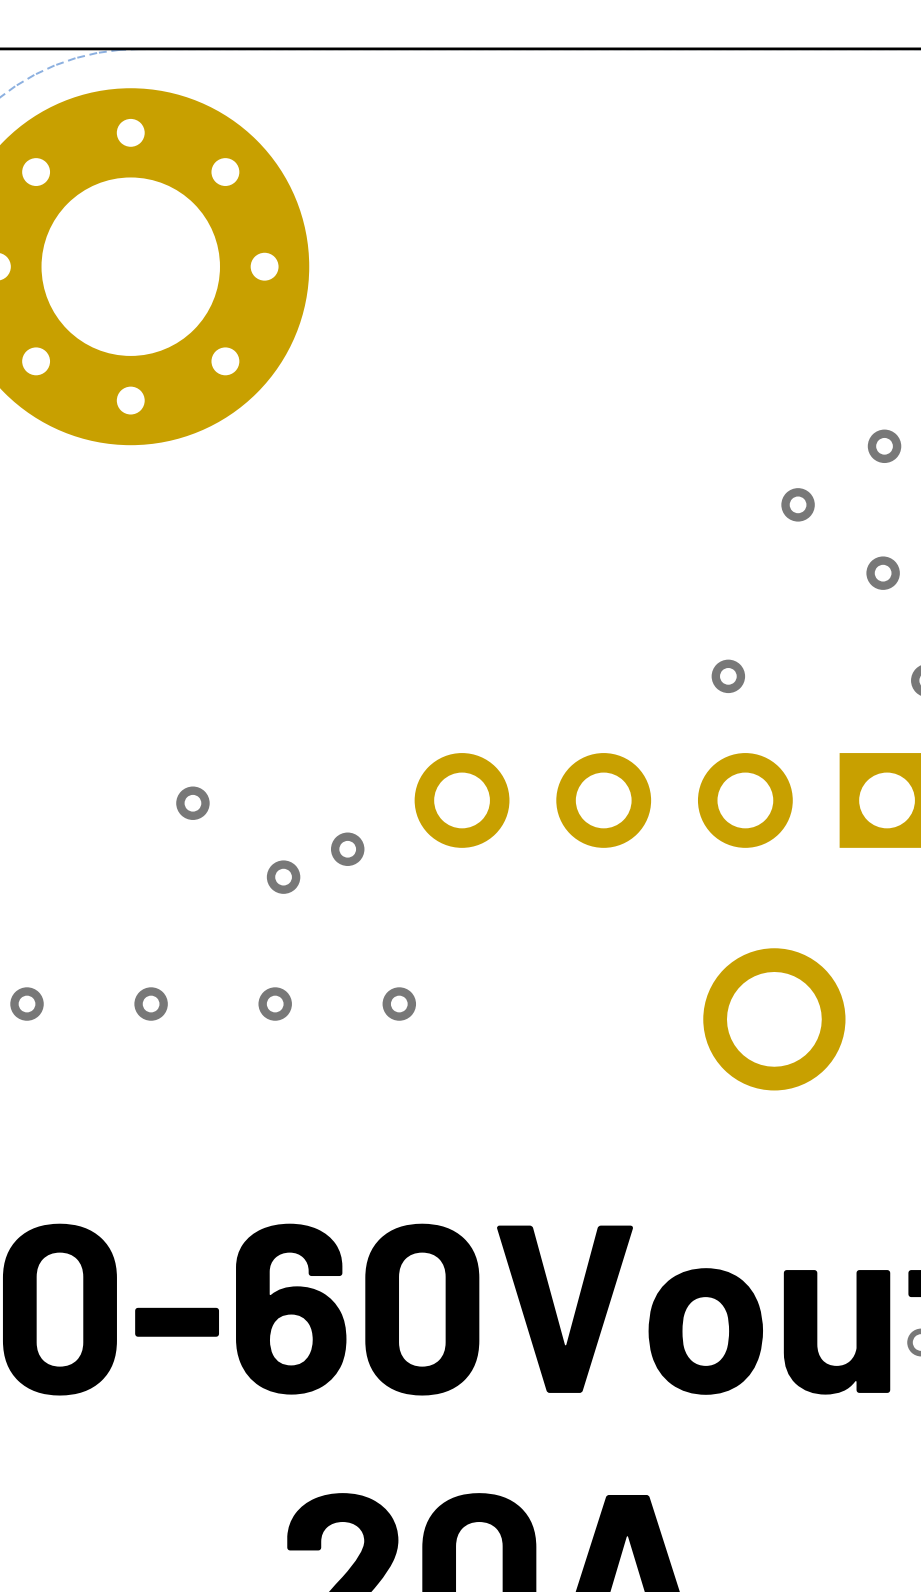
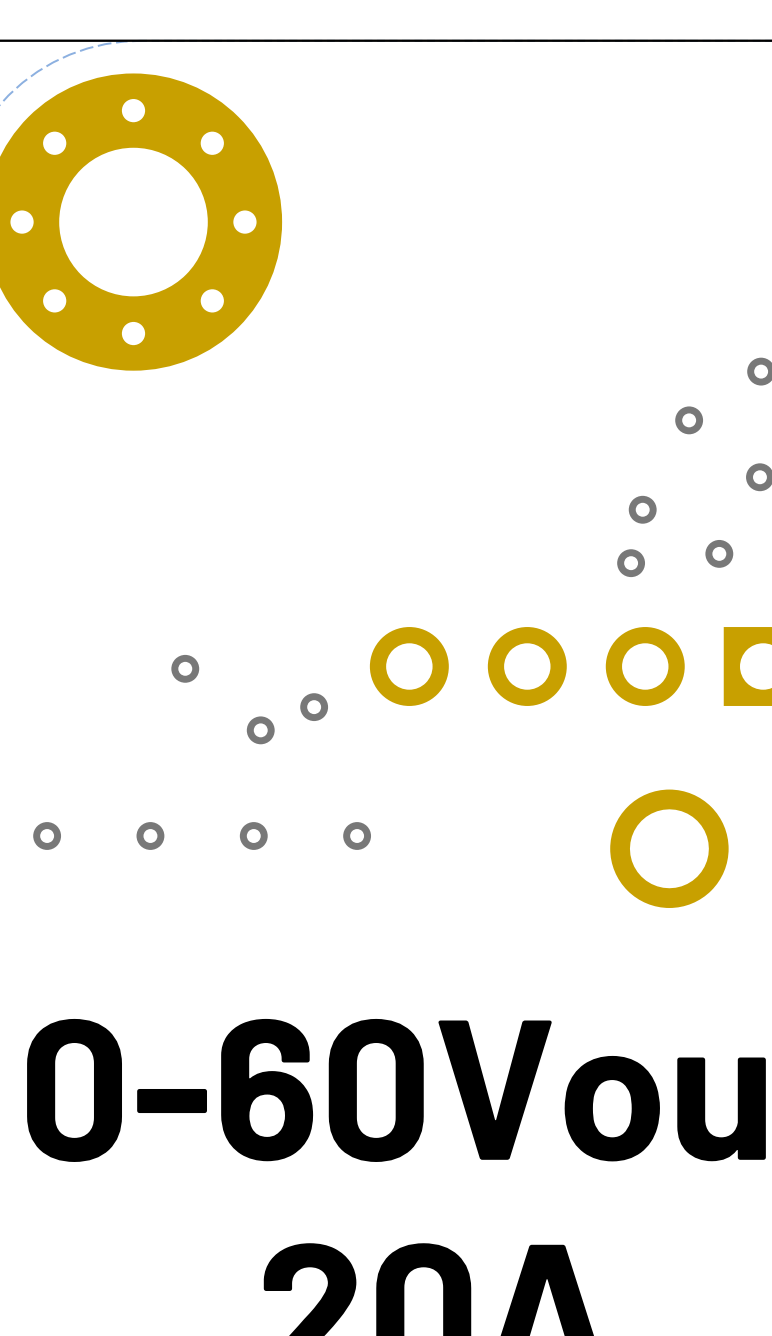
via: none -> (642, 509)
via: none -> (719, 553)

